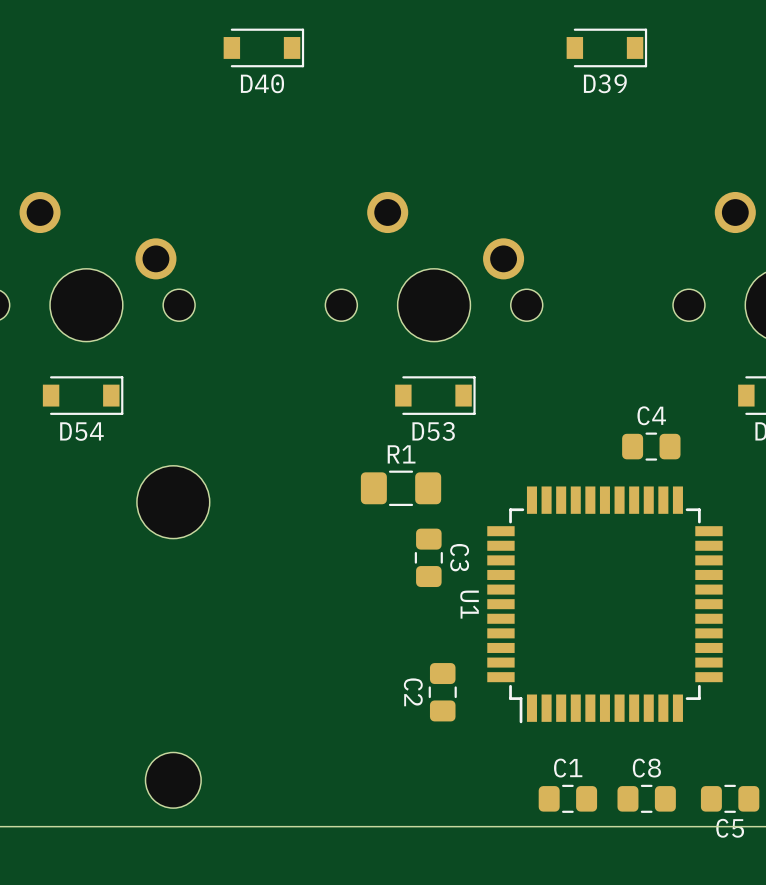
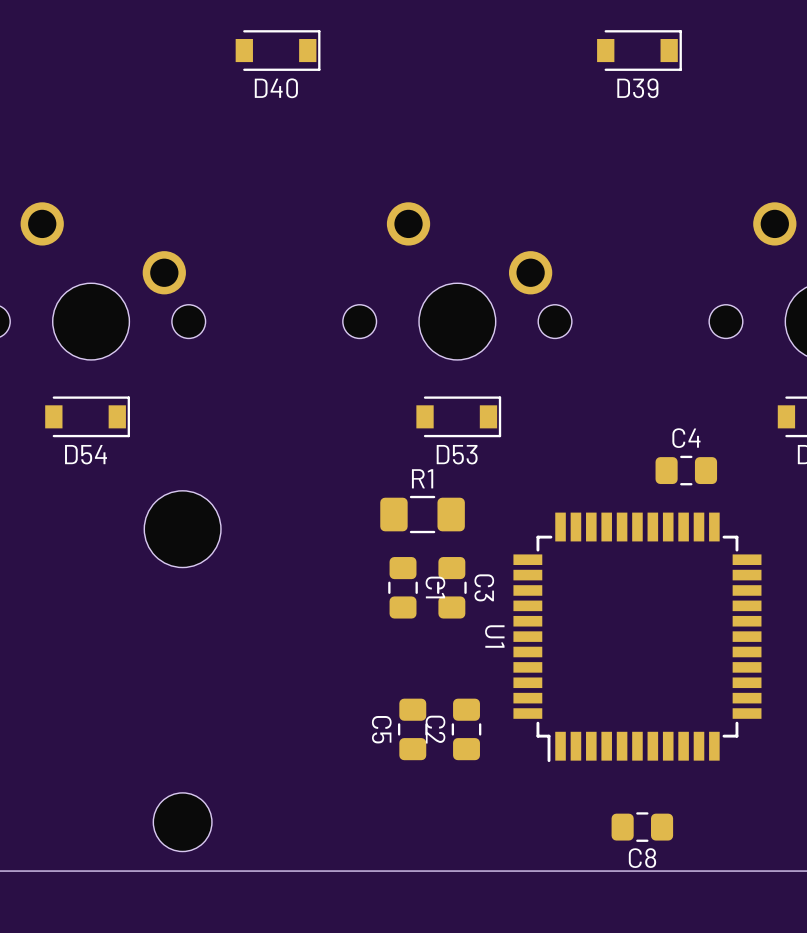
C8 name position: C8 (646, 768) -> C8 (642, 858)
C1 rotation: 0° (567, 798) -> 90° clockwise (403, 587)
C1 position: (567, 798) -> (403, 587)
C8 position: (646, 798) -> (642, 827)
C5 rotation: 0° (730, 798) -> 90° clockwise (412, 729)
C5 position: (730, 798) -> (412, 729)

